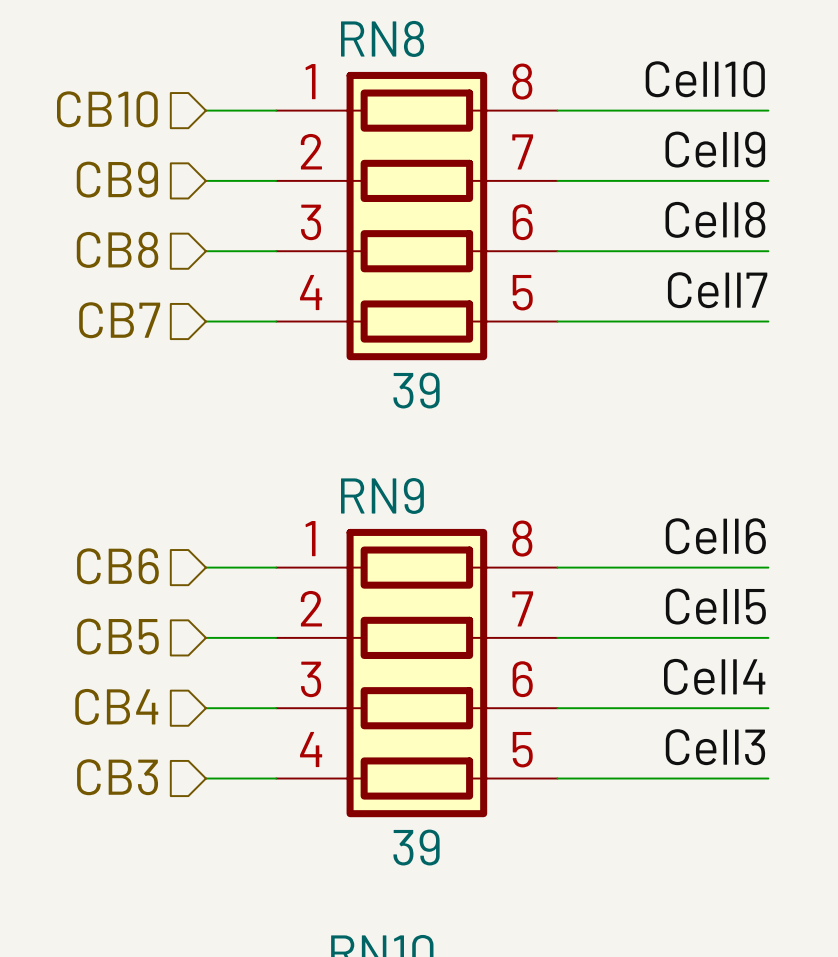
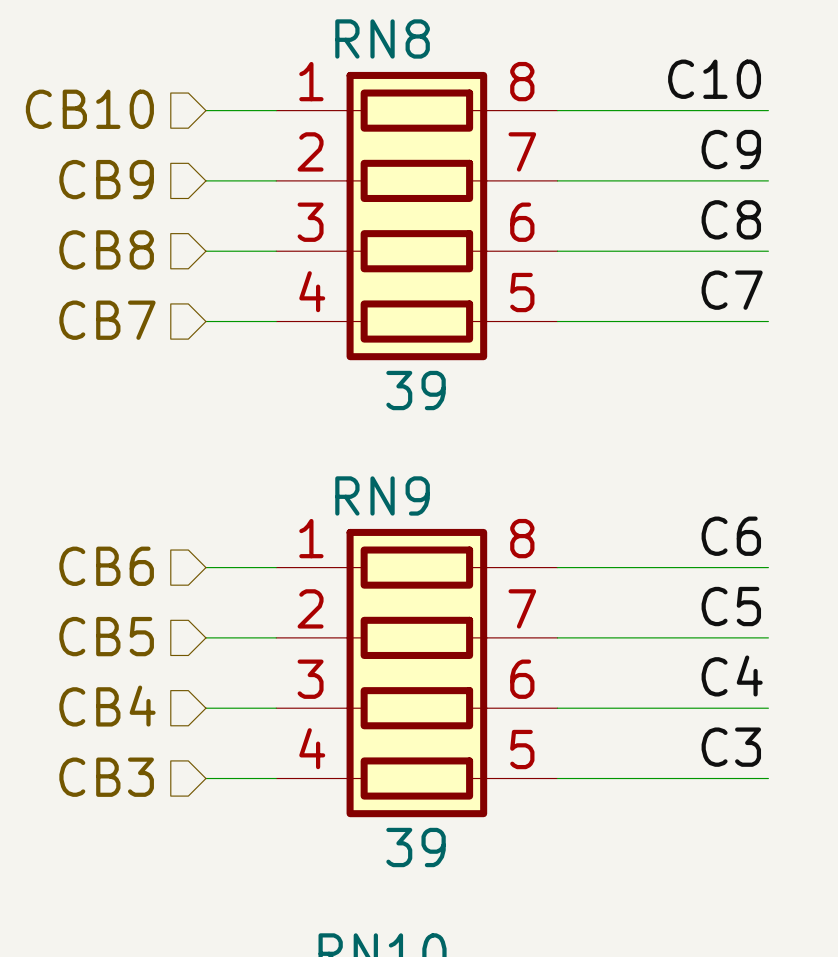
label: Cell10 (705, 79) -> C10 (714, 79)
label: Cell9 (715, 149) -> C9 (731, 149)
label: Cell8 (715, 219) -> C8 (731, 219)
label: Cell7 (717, 290) -> C7 (732, 290)
label: Cell6 (715, 536) -> C6 (731, 536)
label: Cell5 (715, 606) -> C5 (731, 606)
label: Cell4 (714, 676) -> C4 (732, 676)
label: Cell3 (715, 747) -> C3 (731, 747)

